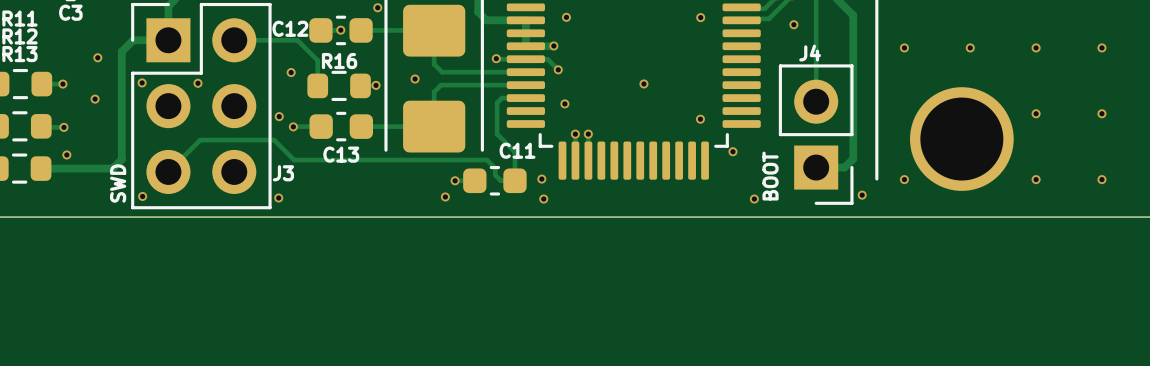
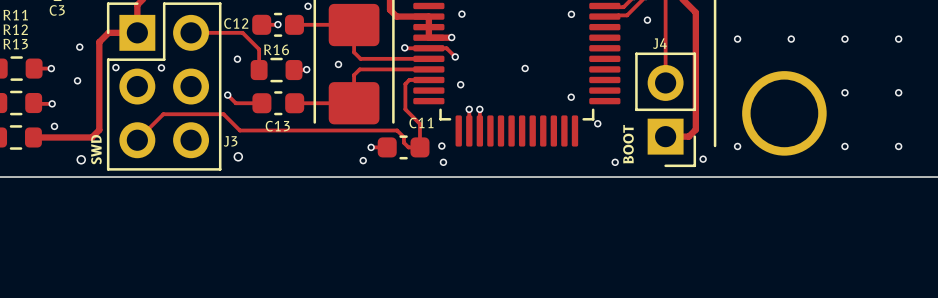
track: none -> (227, 95) (235, 103) (239, 103)
via: (293, 126) -> none
via: none -> (238, 156)
via: none -> (81, 159)
via: (142, 196) -> none
via: (278, 198) -> none

